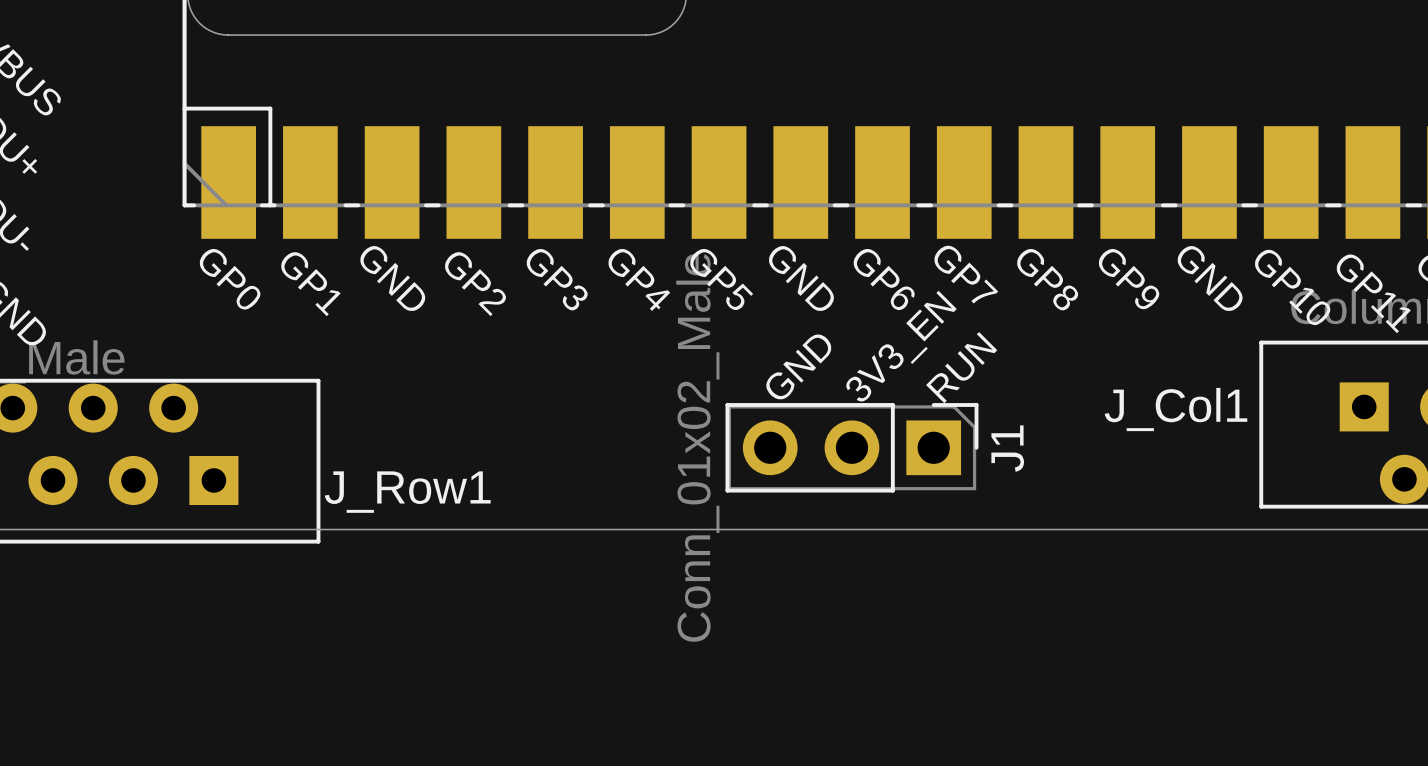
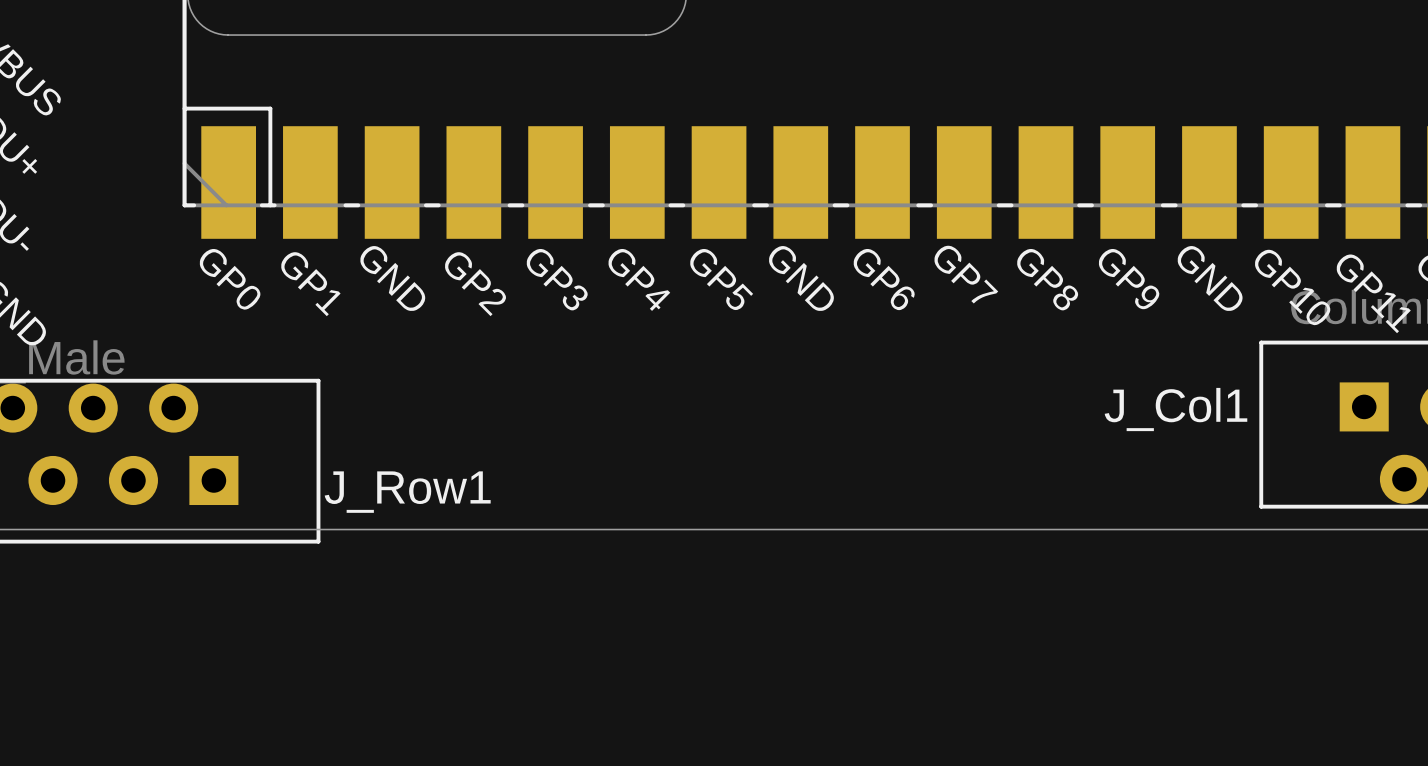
text: 3V3_EN (901, 346) -> none
text: GND (799, 367) -> none
text: RUN (961, 367) -> none
J1: Conn_01x02_Male (851, 447) -> none

